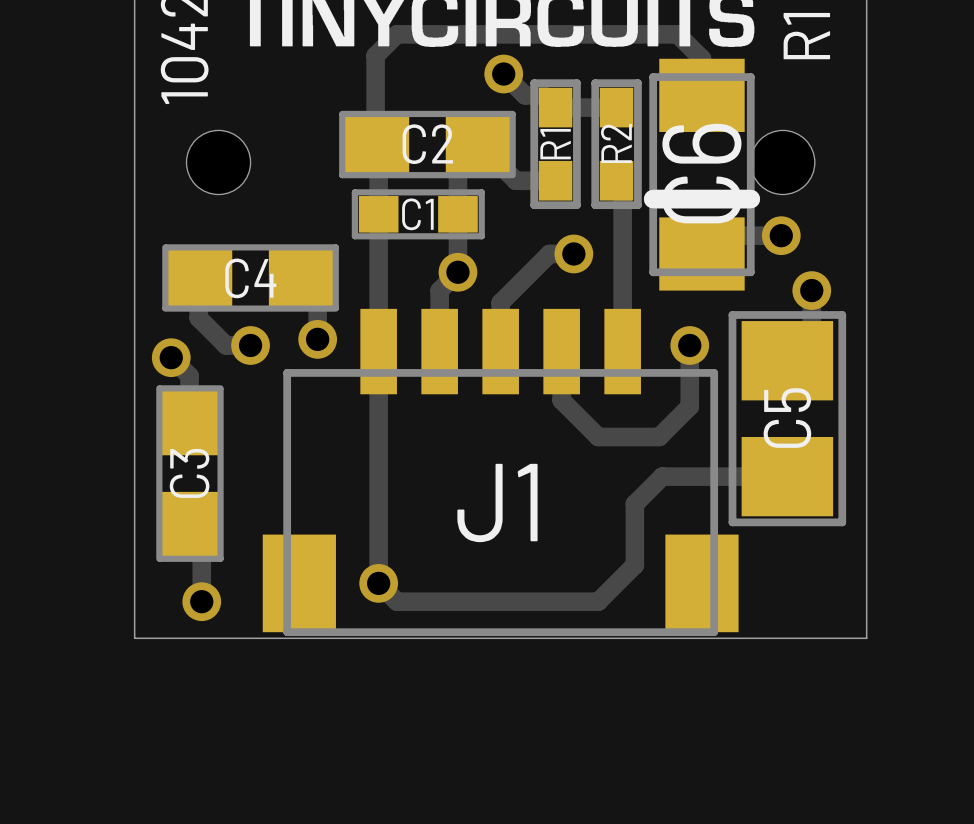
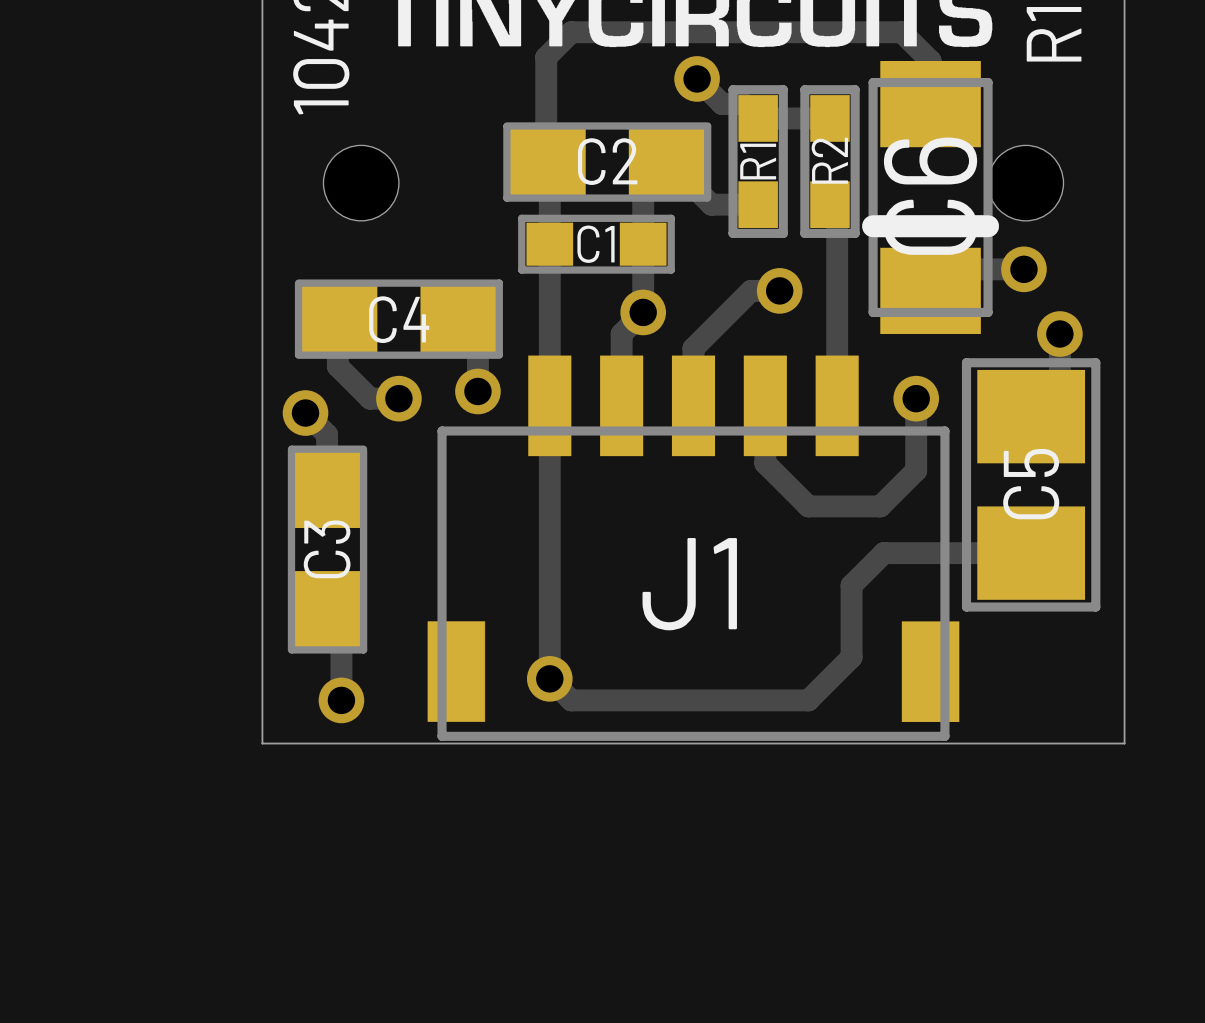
J1 footprint: [262, 308, 739, 637] -> [427, 355, 960, 741]

